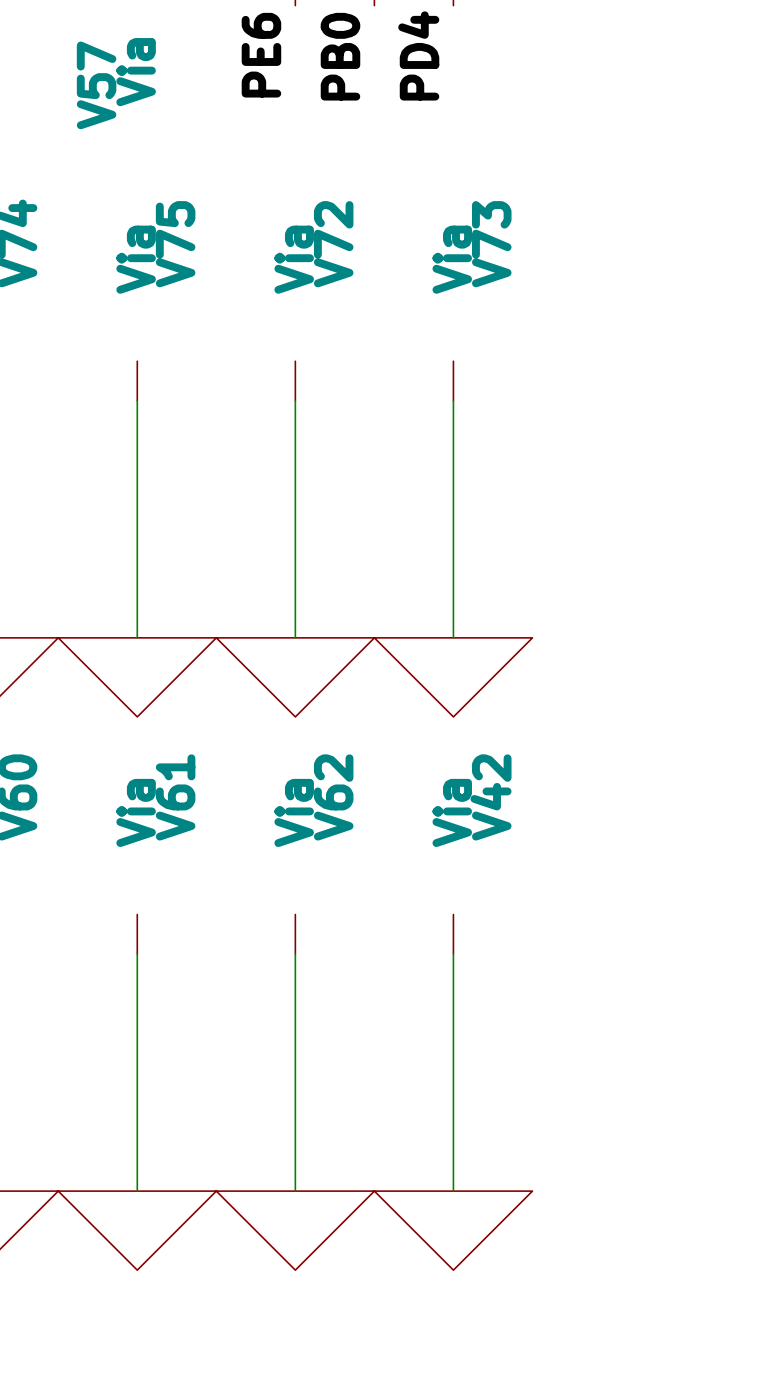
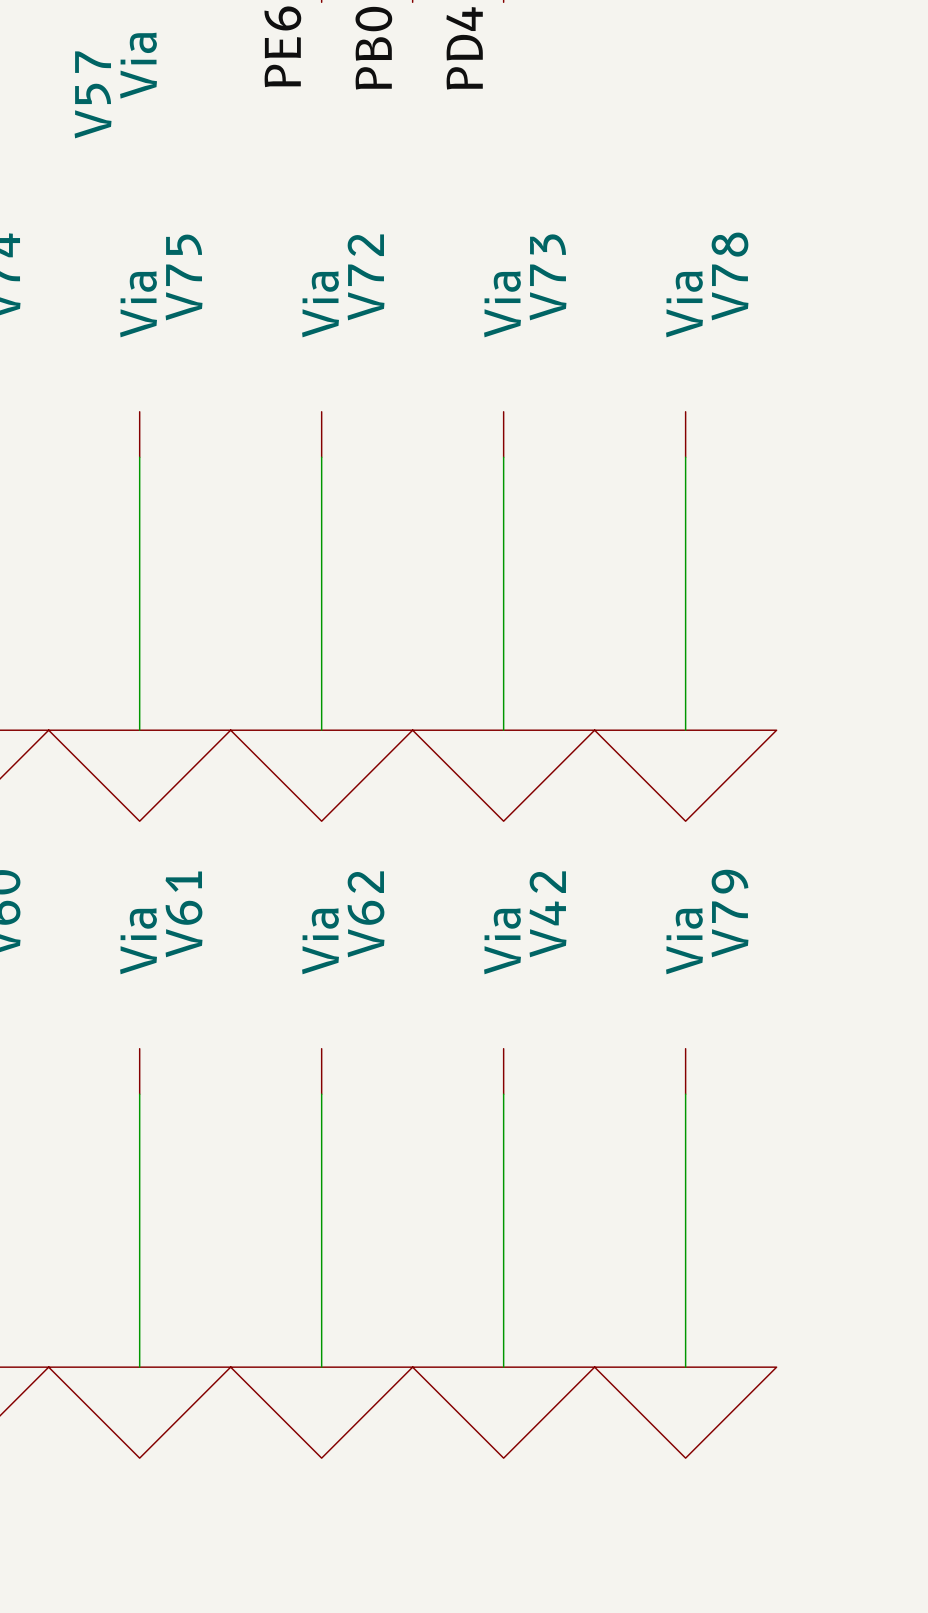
V78: none -> (685, 434)
wire: none -> (685, 457) (685, 730)
power symbol: none -> (685, 775)
V79: none -> (685, 1071)
wire: none -> (685, 1094) (685, 1367)
power symbol: none -> (685, 1412)

